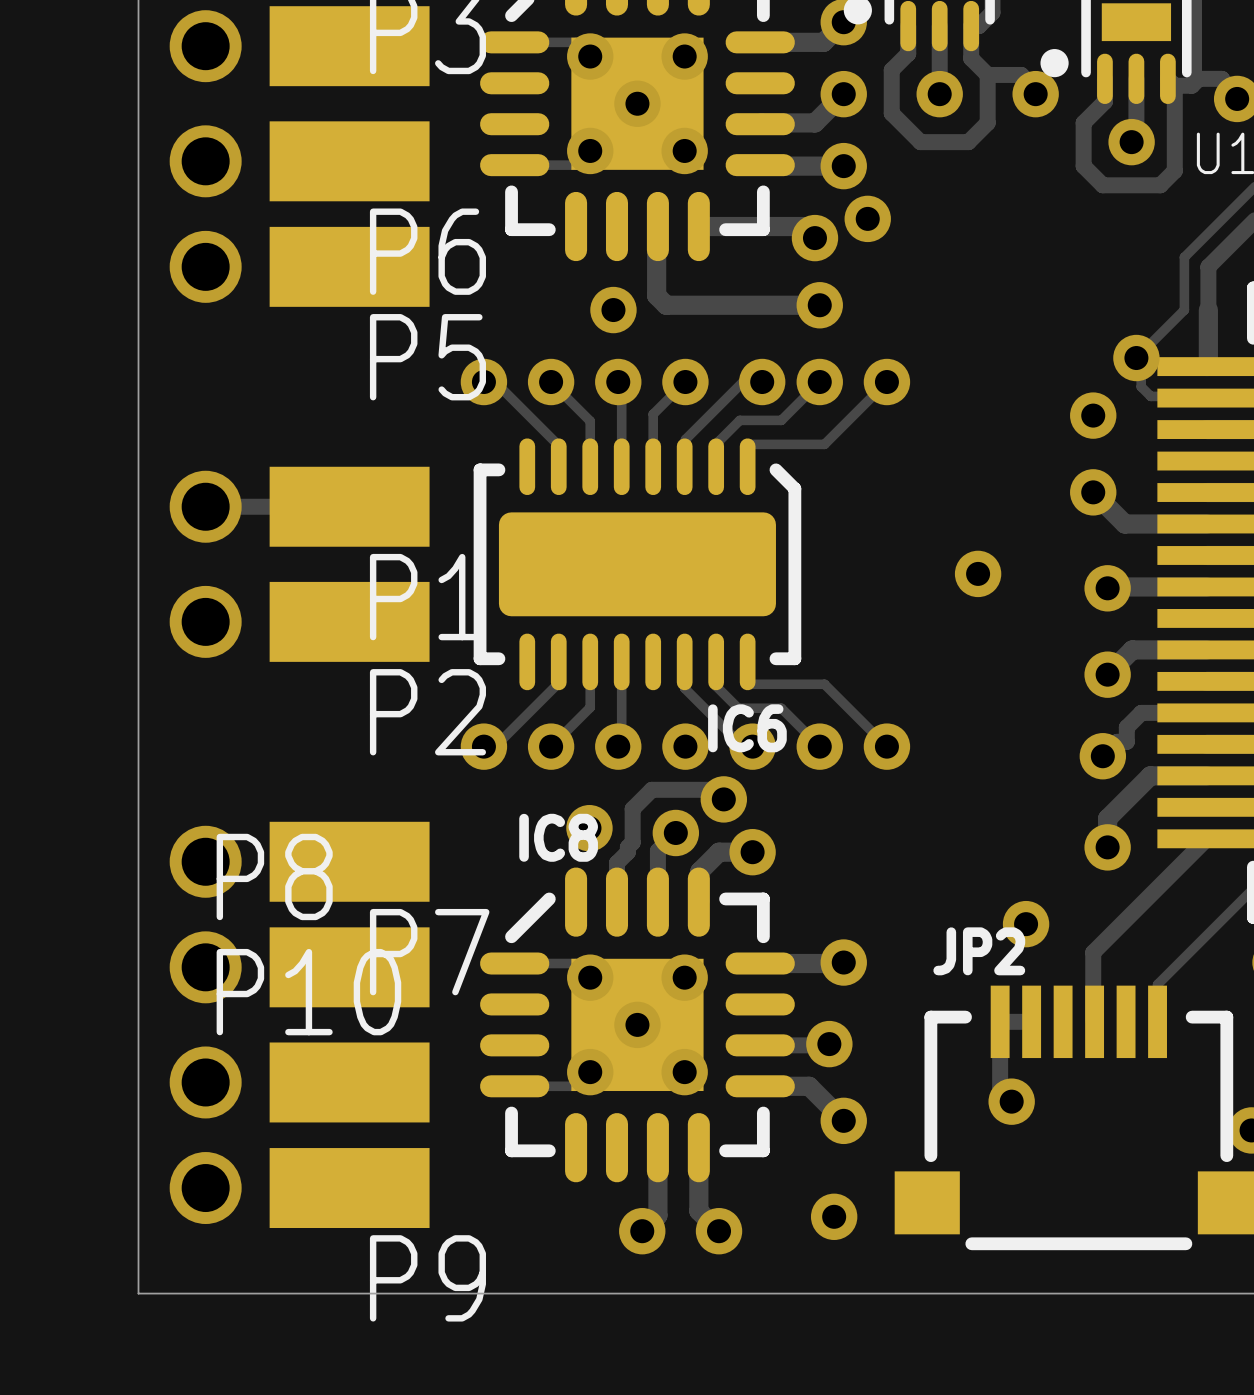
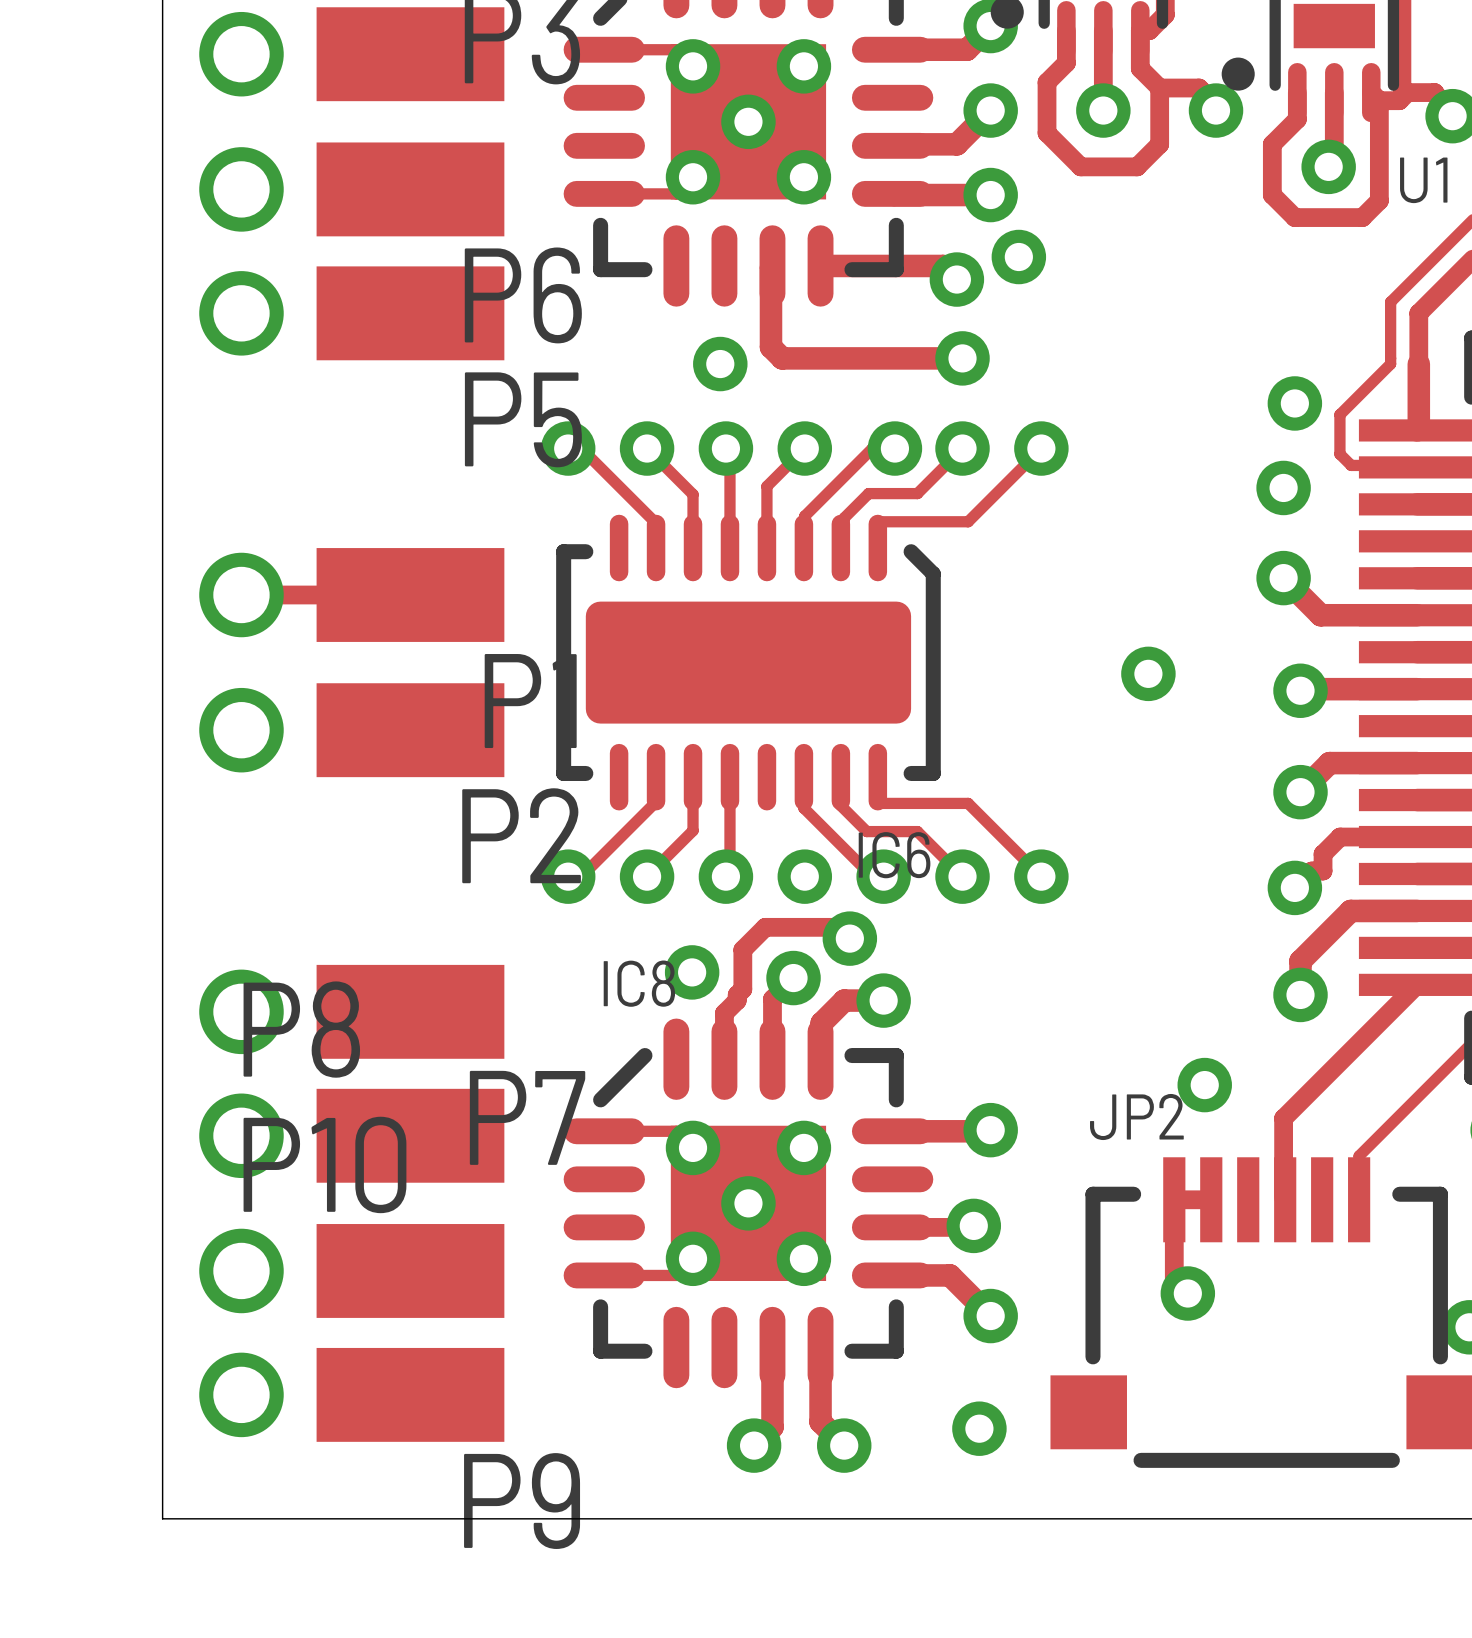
via position: (1136, 358) -> (1294, 403)

